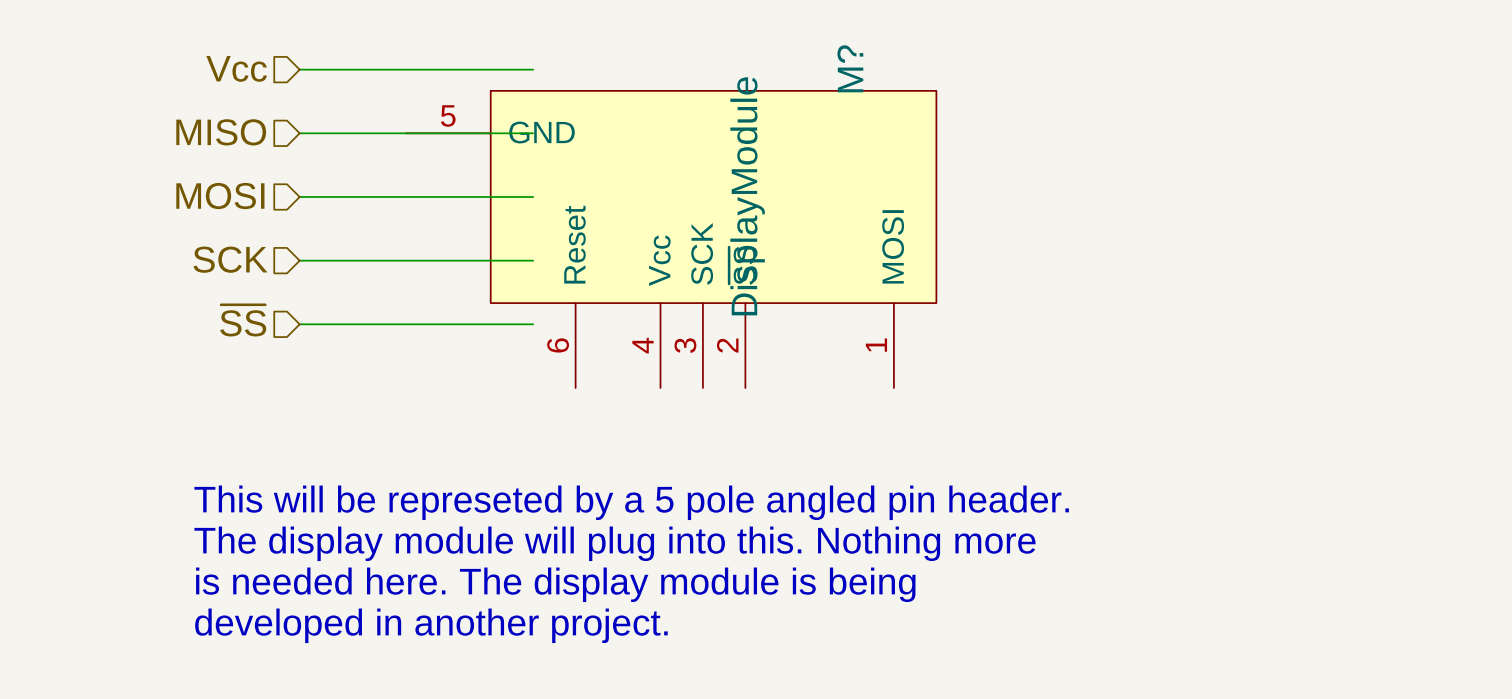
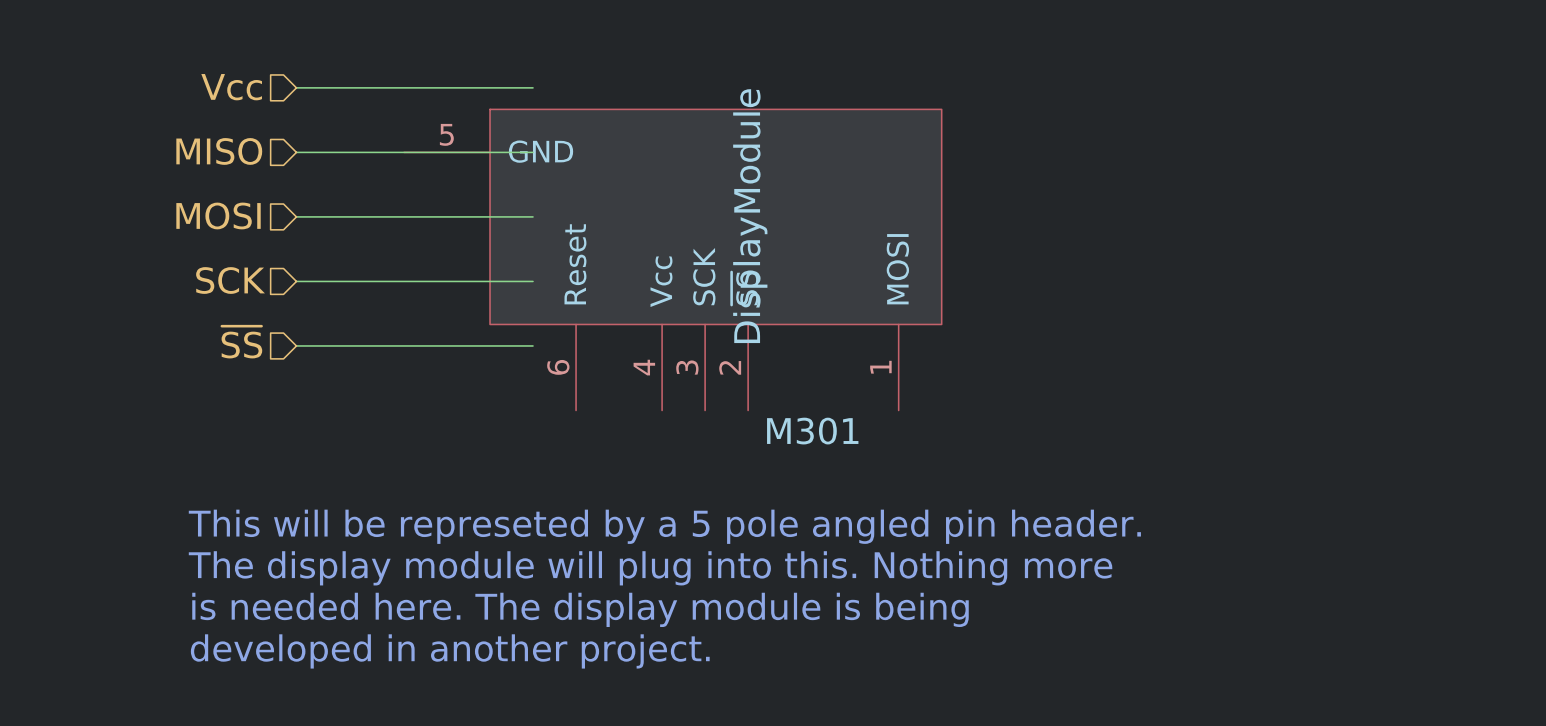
M? name: M? (850, 68) -> M301 (812, 431)

